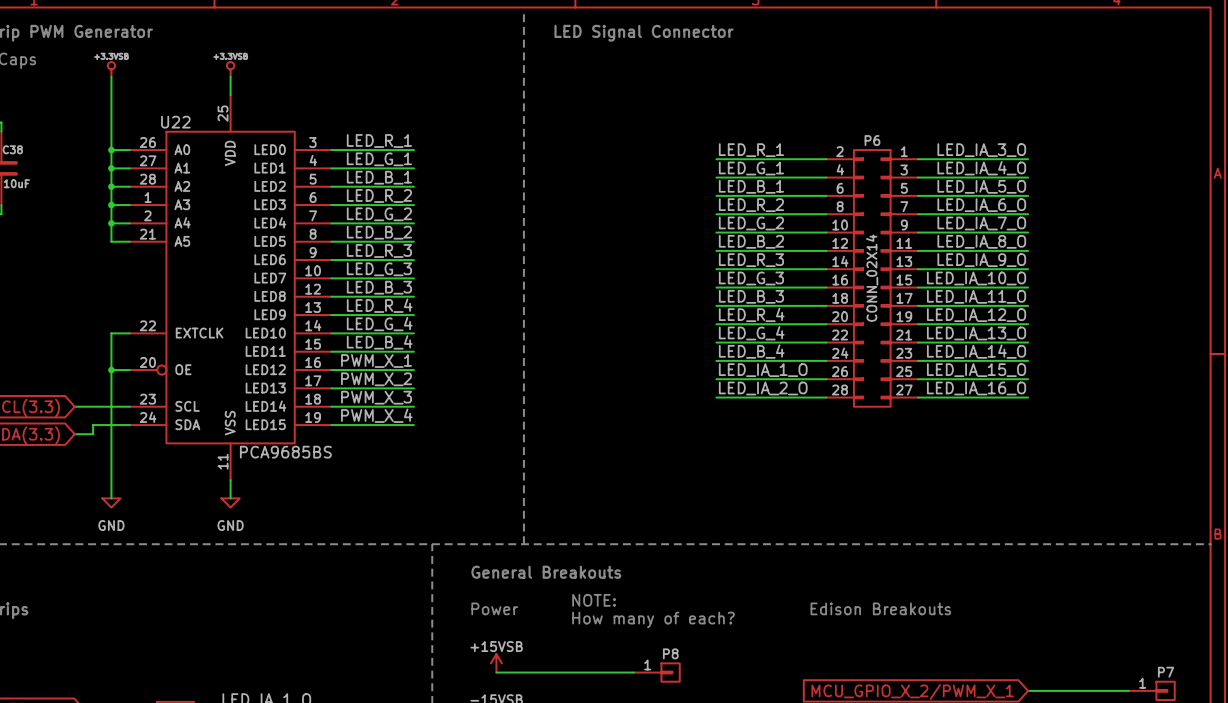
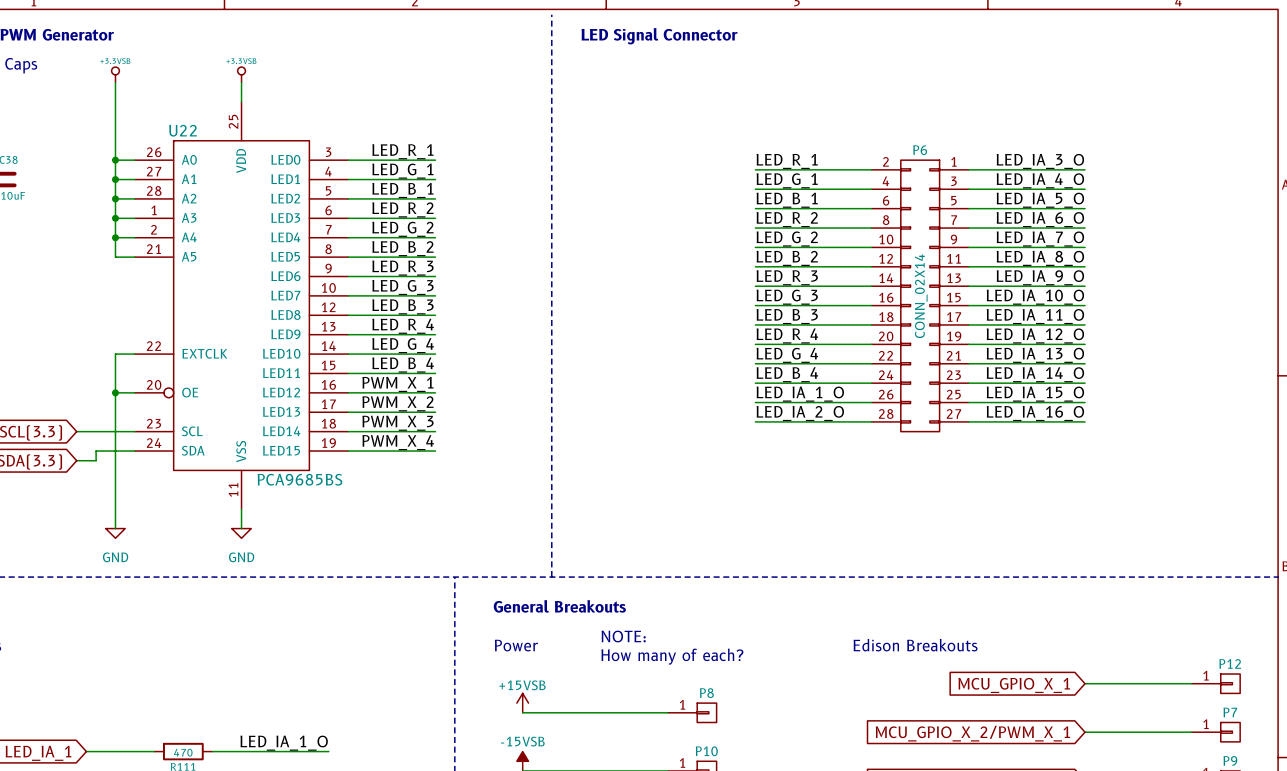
global label: none -> MCU_GPIO_X_1 (1014, 685)
wire: none -> (1085, 683) (1191, 683)
P12: none -> (1215, 683)

